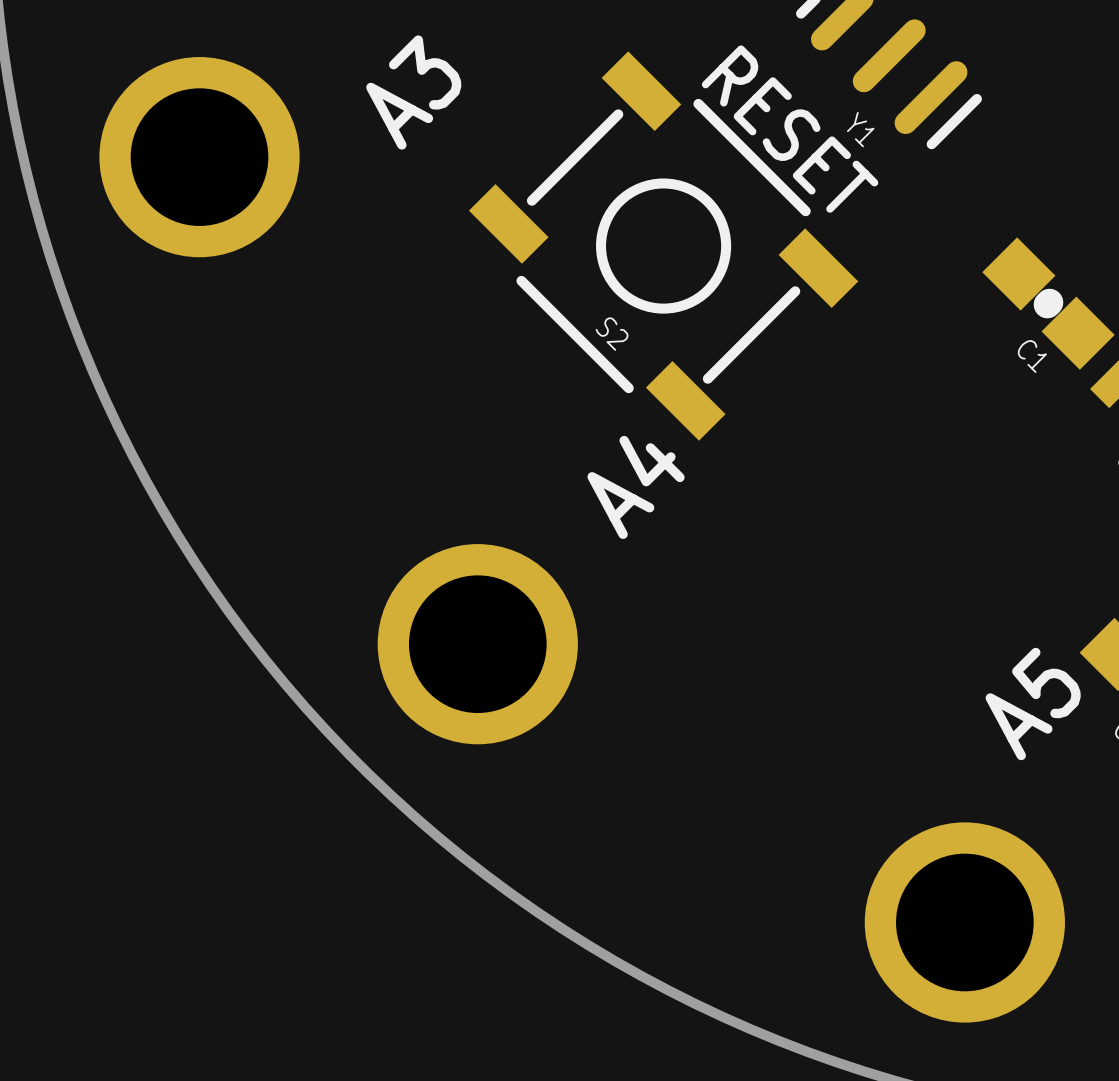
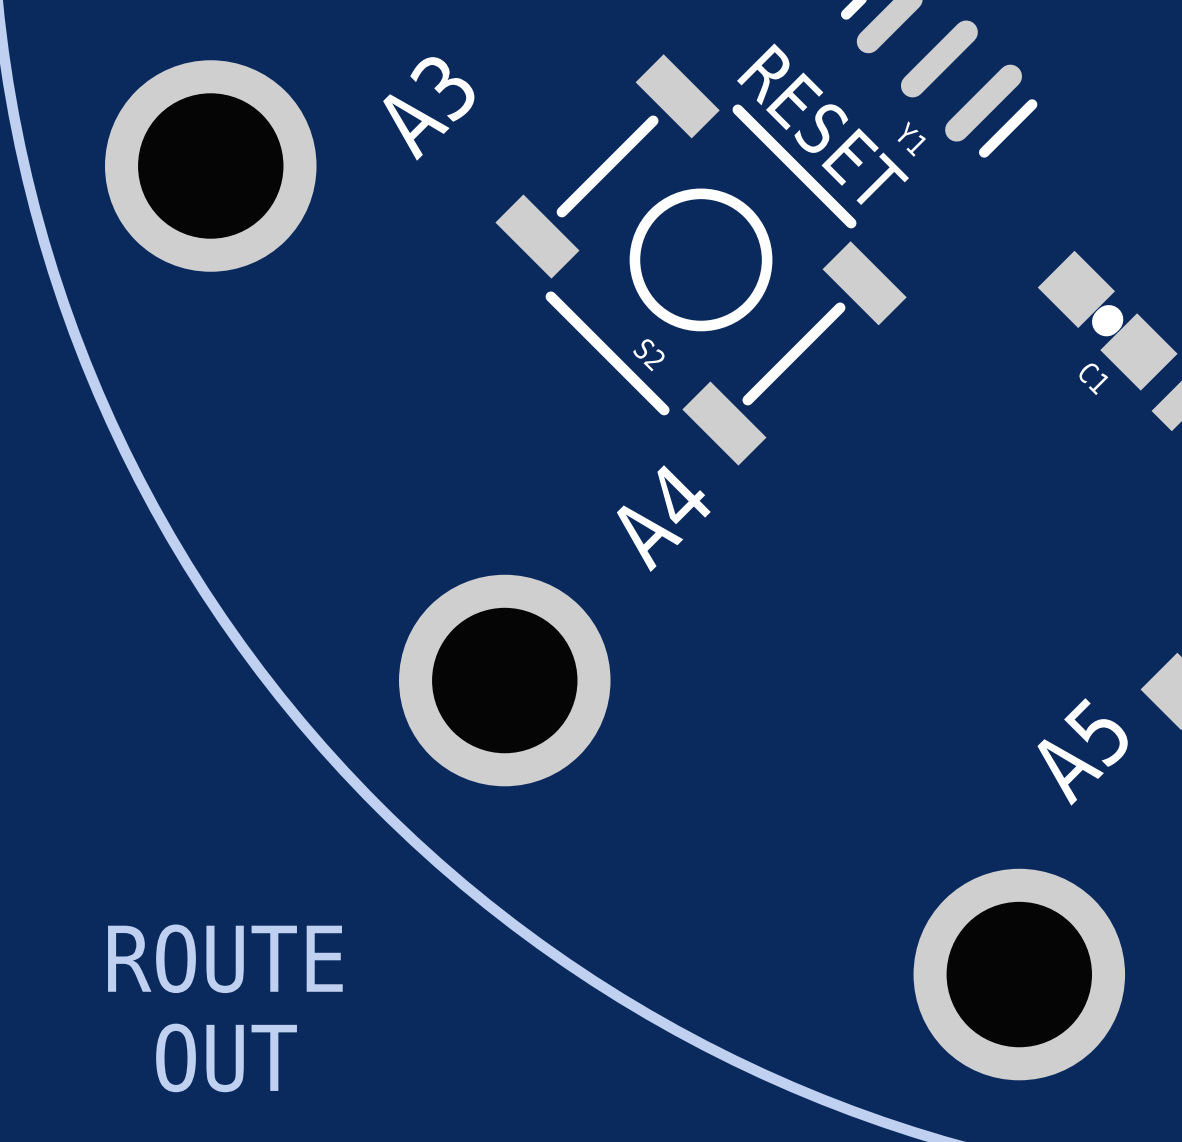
text: none -> ROUTE (225, 958)
text: none -> OUT (226, 1057)

